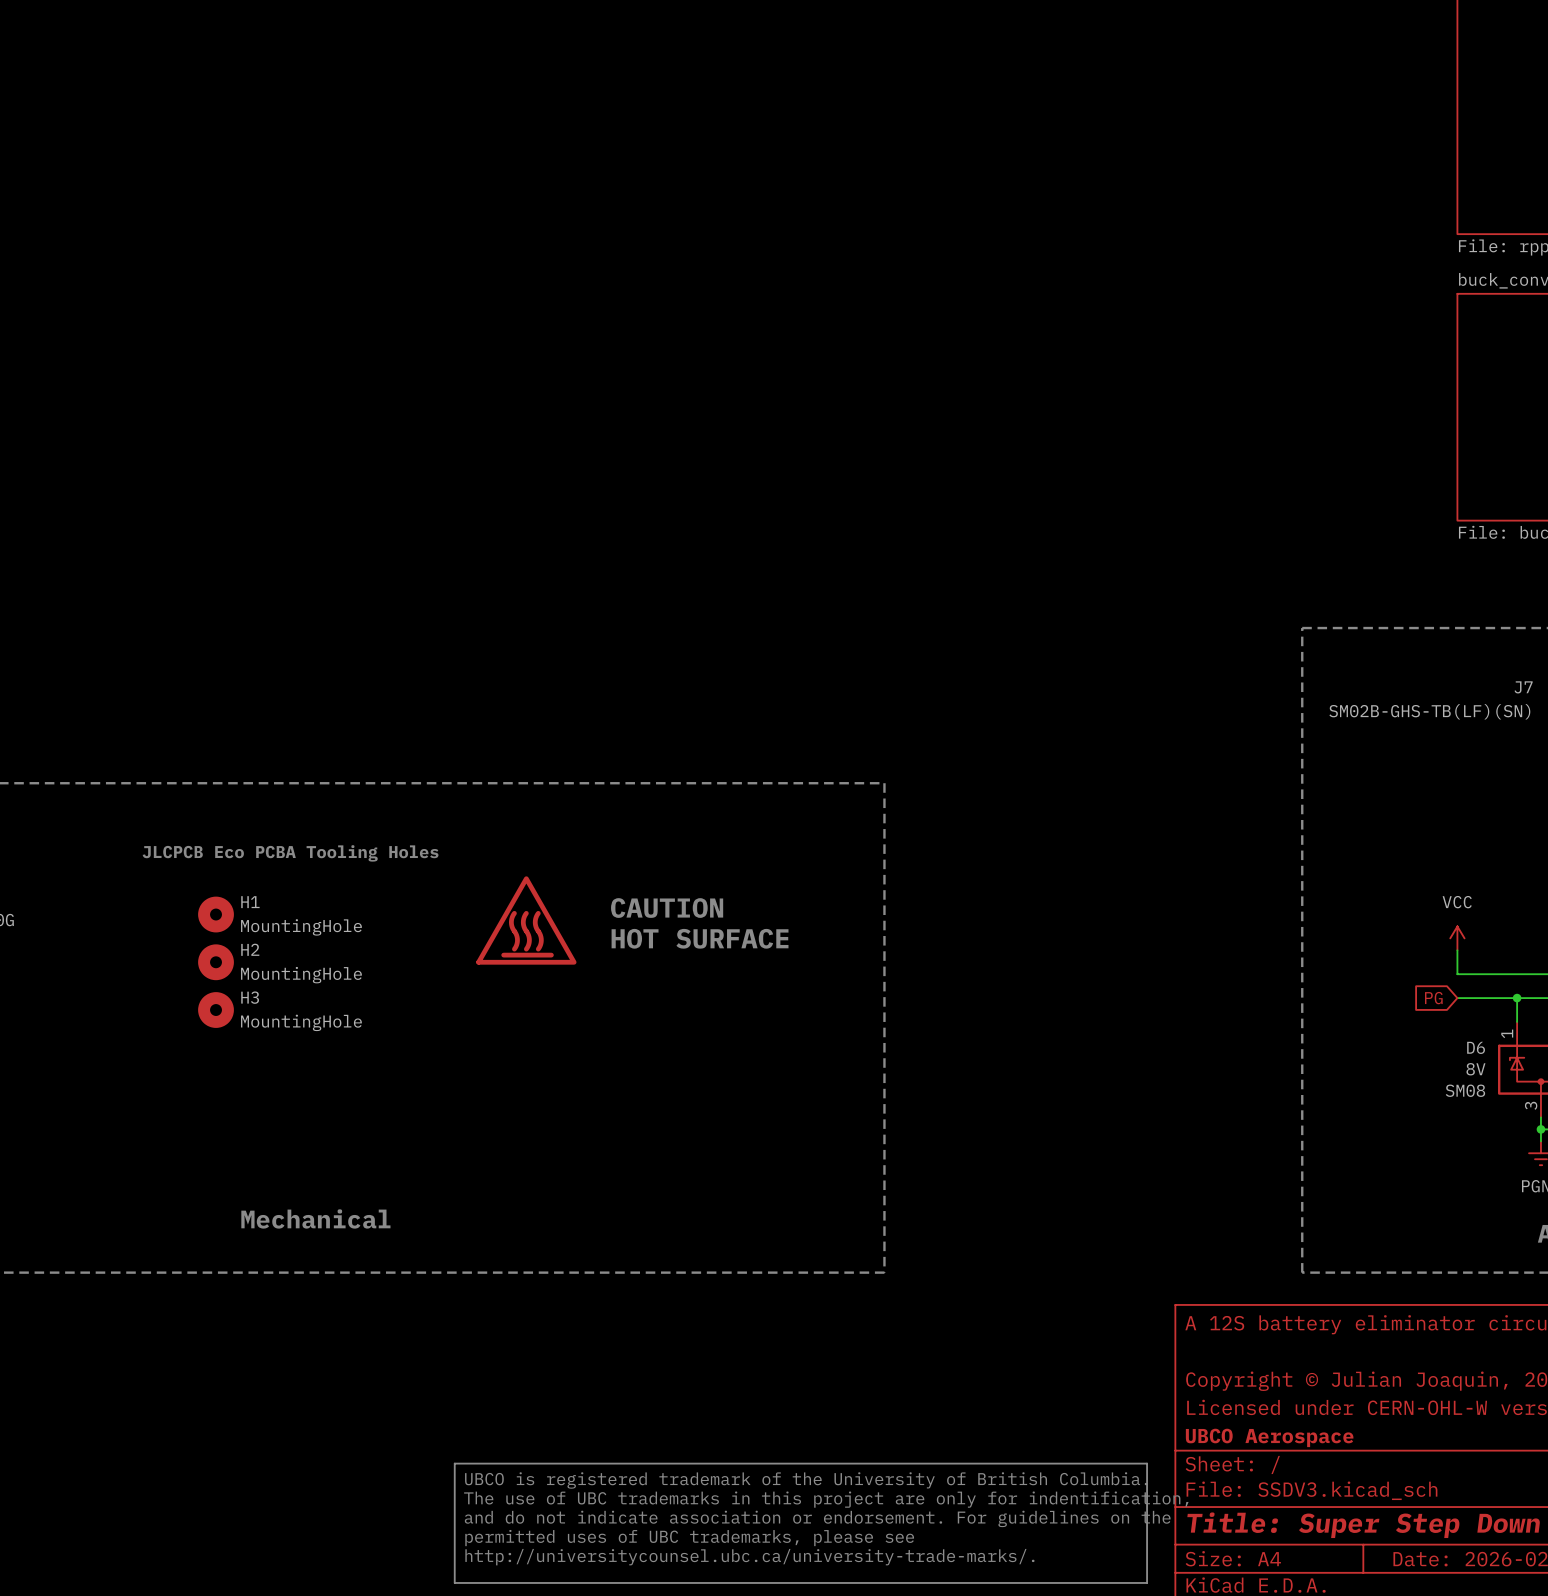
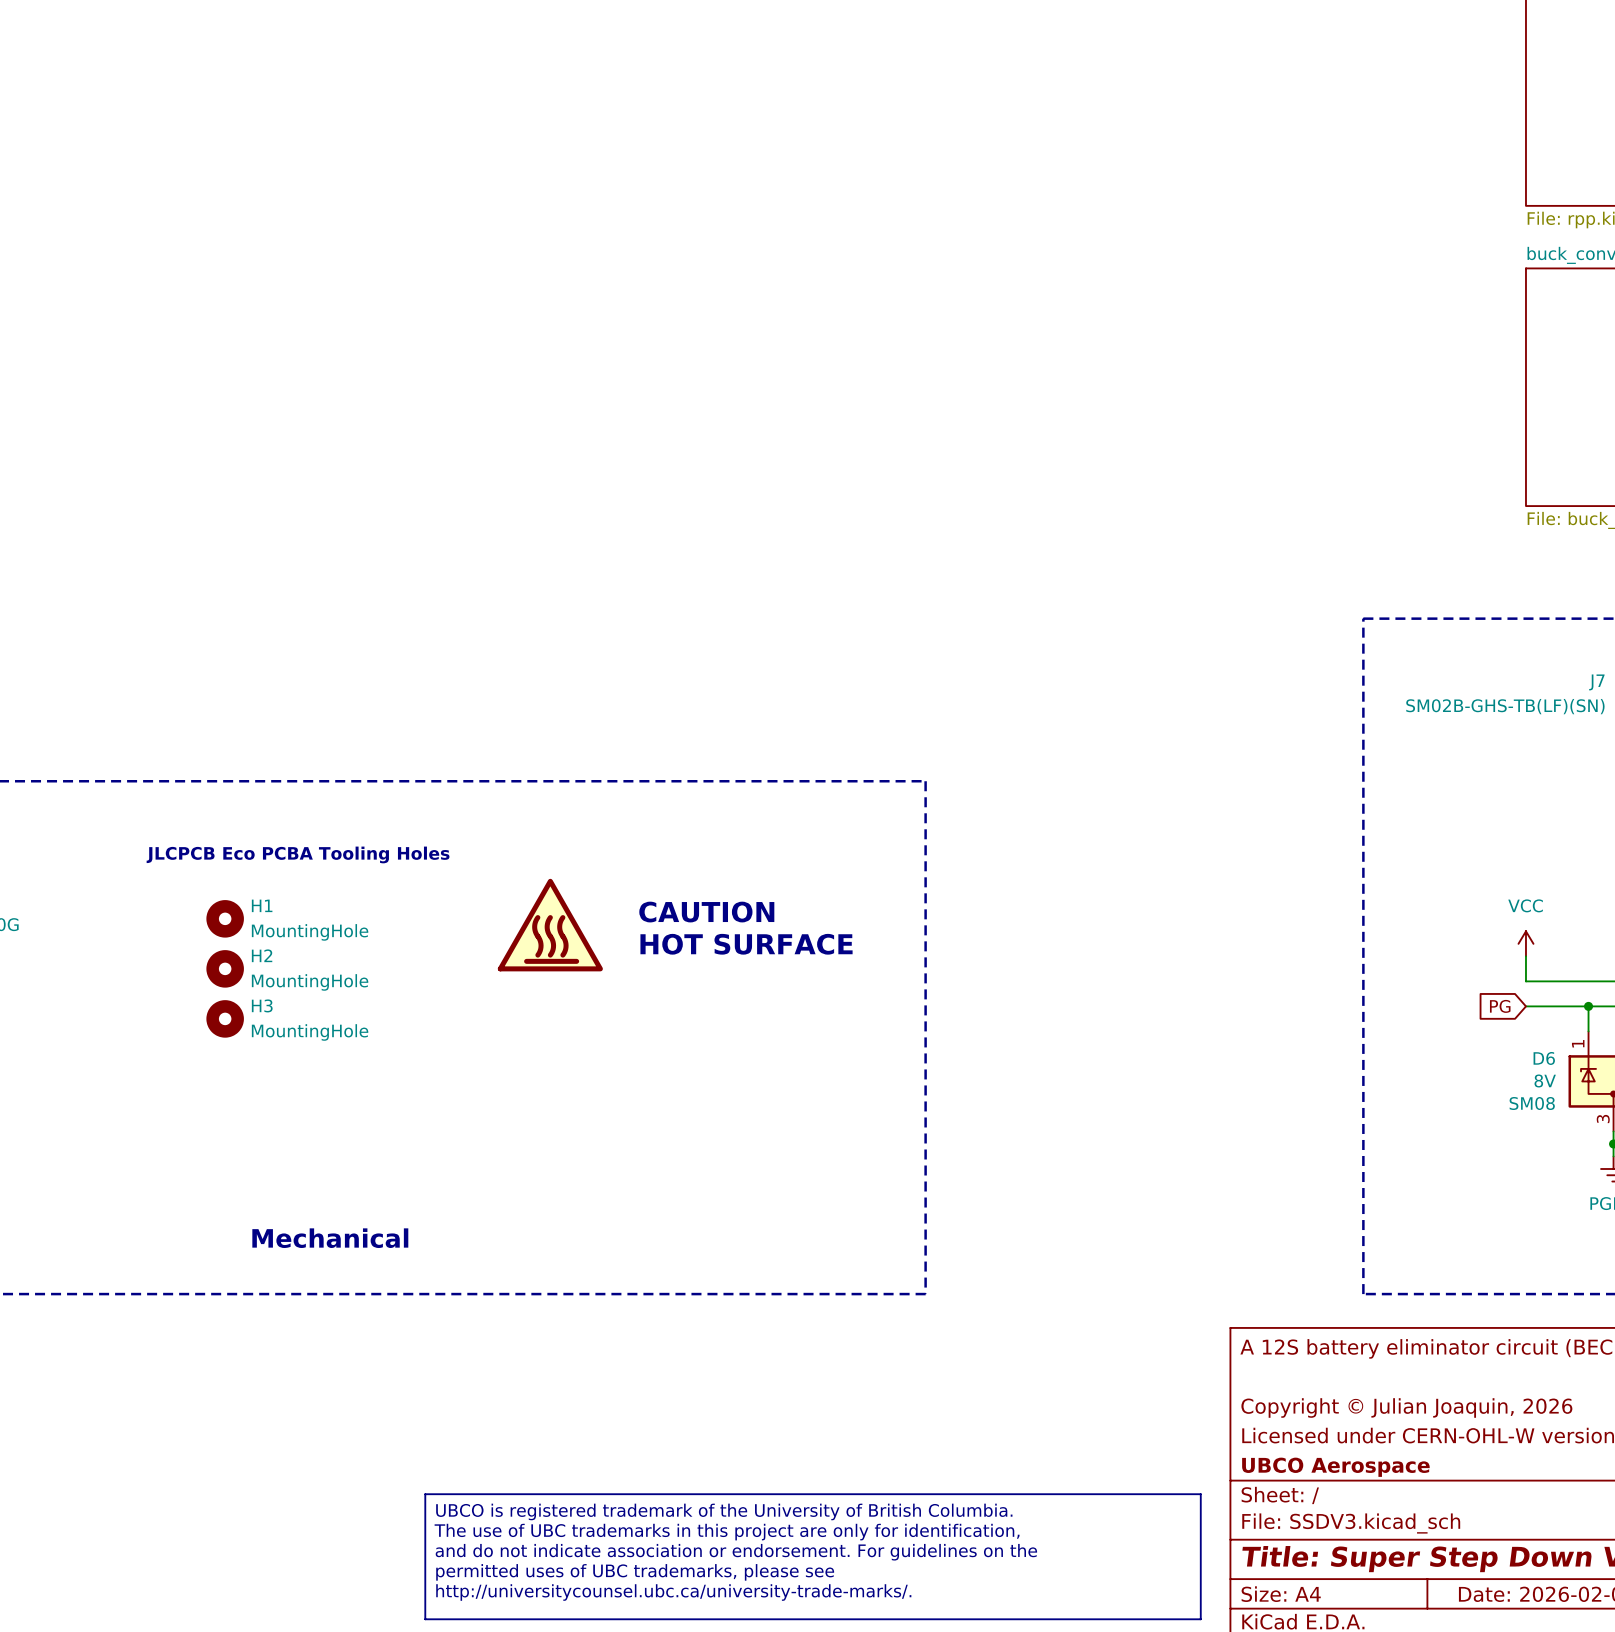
line: (454, 1463) (454, 1582) -> (475, 1494) (425, 1494) (425, 1619) (475, 1619)
text position: UBCO is registered trademark of the University of British Columbia. (806, 1480) -> UBCO is registered trademark of the University of British Columbia. (724, 1511)
text: The use of UBC trademarks in this project are only for indentification, (826, 1499) -> The use of UBC trademarks in this project are only for identification, (727, 1532)
text position: and do not indicate association or endorsement. For guidelines on the (817, 1518) -> and do not indicate association or endorsement. For guidelines on the (736, 1552)
text position: permitted uses of UBC trademarks, please see (689, 1538) -> permitted uses of UBC trademarks, please see (635, 1572)
text position: http://universitycounsel.ubc.ca/university-trade-marks/. (749, 1557) -> http://universitycounsel.ubc.ca/university-trade-marks/. (673, 1592)

